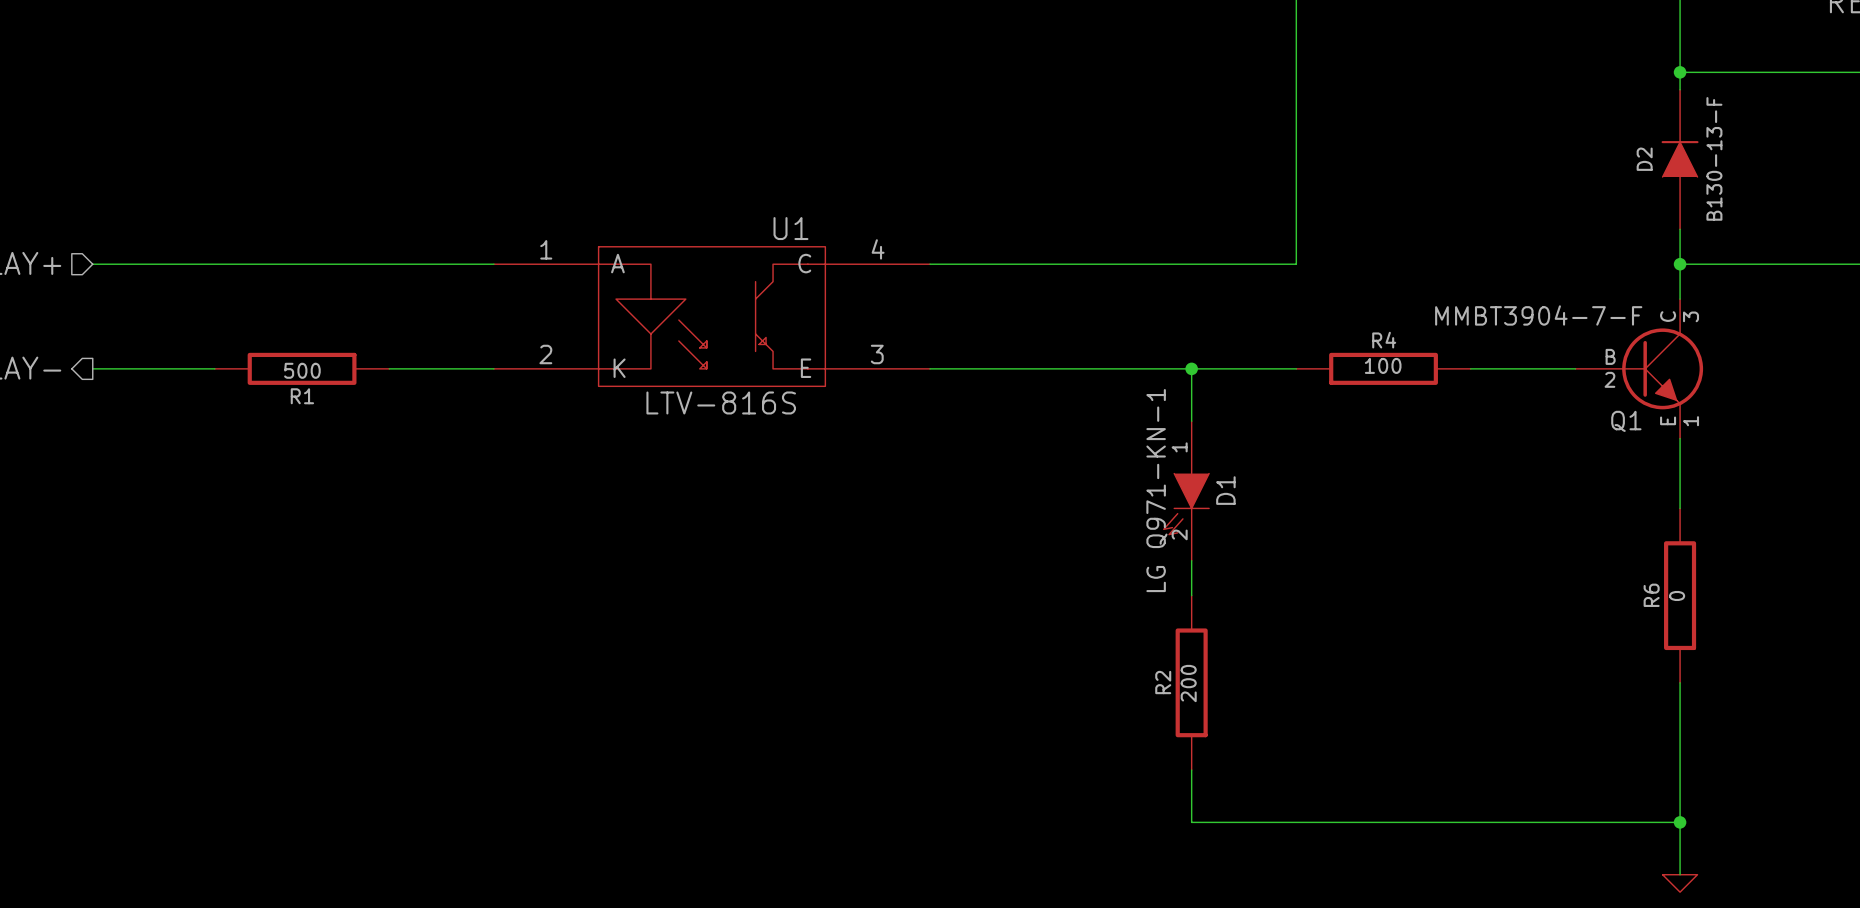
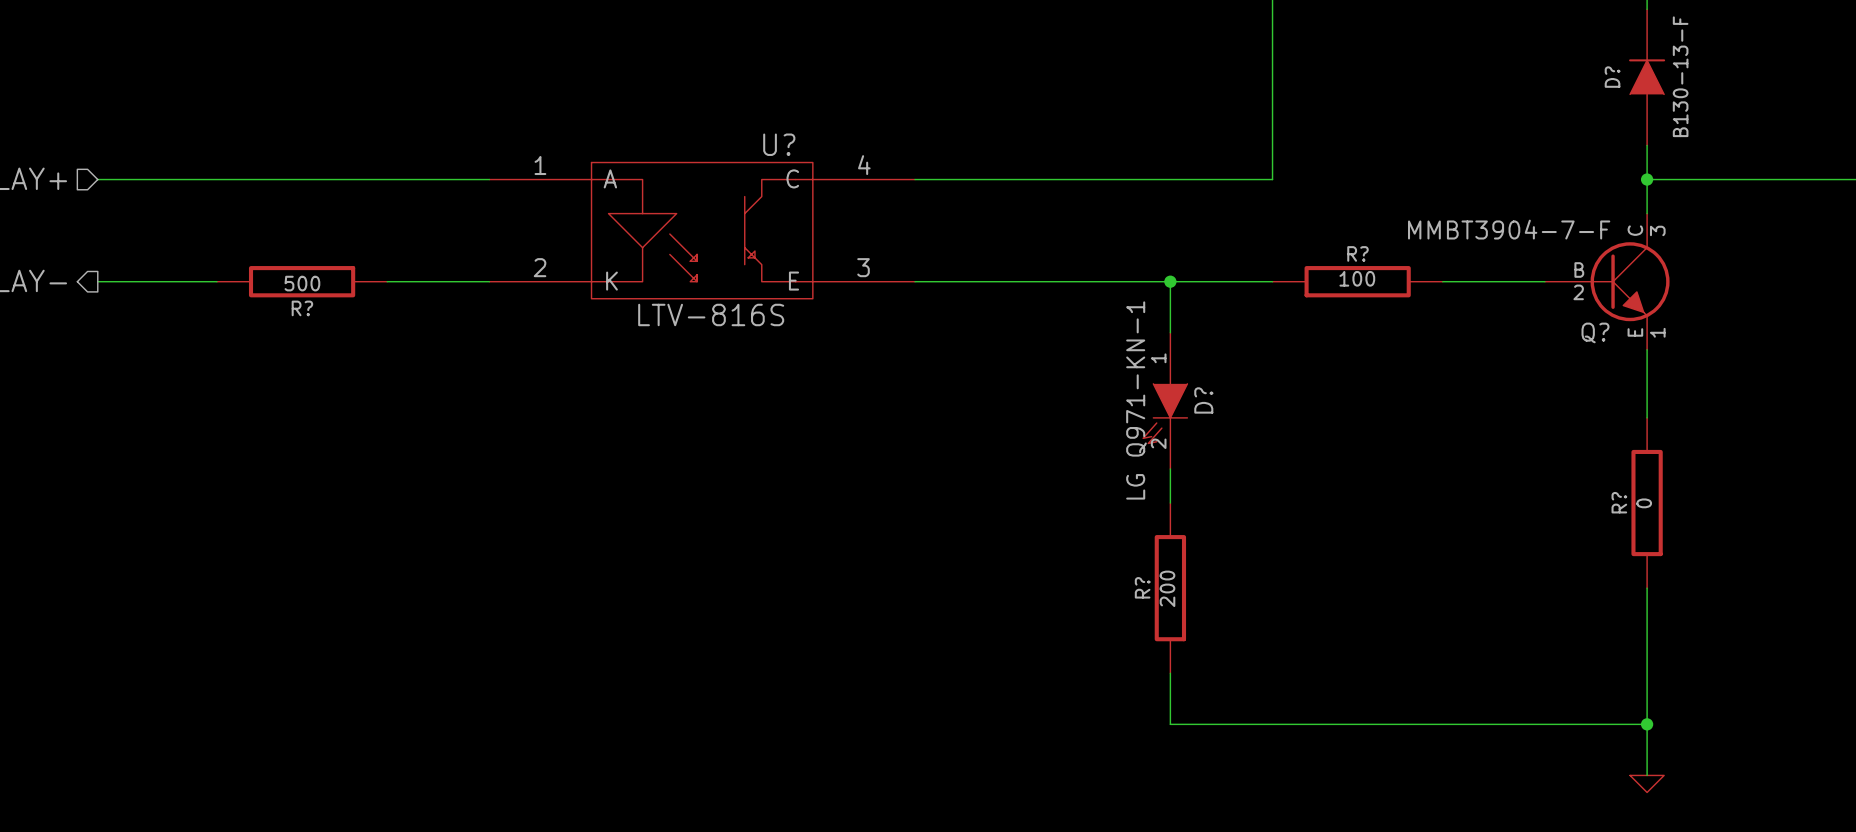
D2 name: D2 (1644, 159) -> D? (1612, 77)
U1 name: U1 (790, 228) -> U? (779, 144)
R4 name: R4 (1384, 340) -> R? (1357, 253)
R1 name: R1 (302, 396) -> R? (302, 308)
Q1 name: Q1 (1626, 421) -> Q? (1595, 332)
D1 name: D1 (1225, 490) -> D? (1203, 400)
R6 name: R6 (1651, 595) -> R? (1619, 502)
R2 name: R2 (1163, 682) -> R? (1142, 587)

